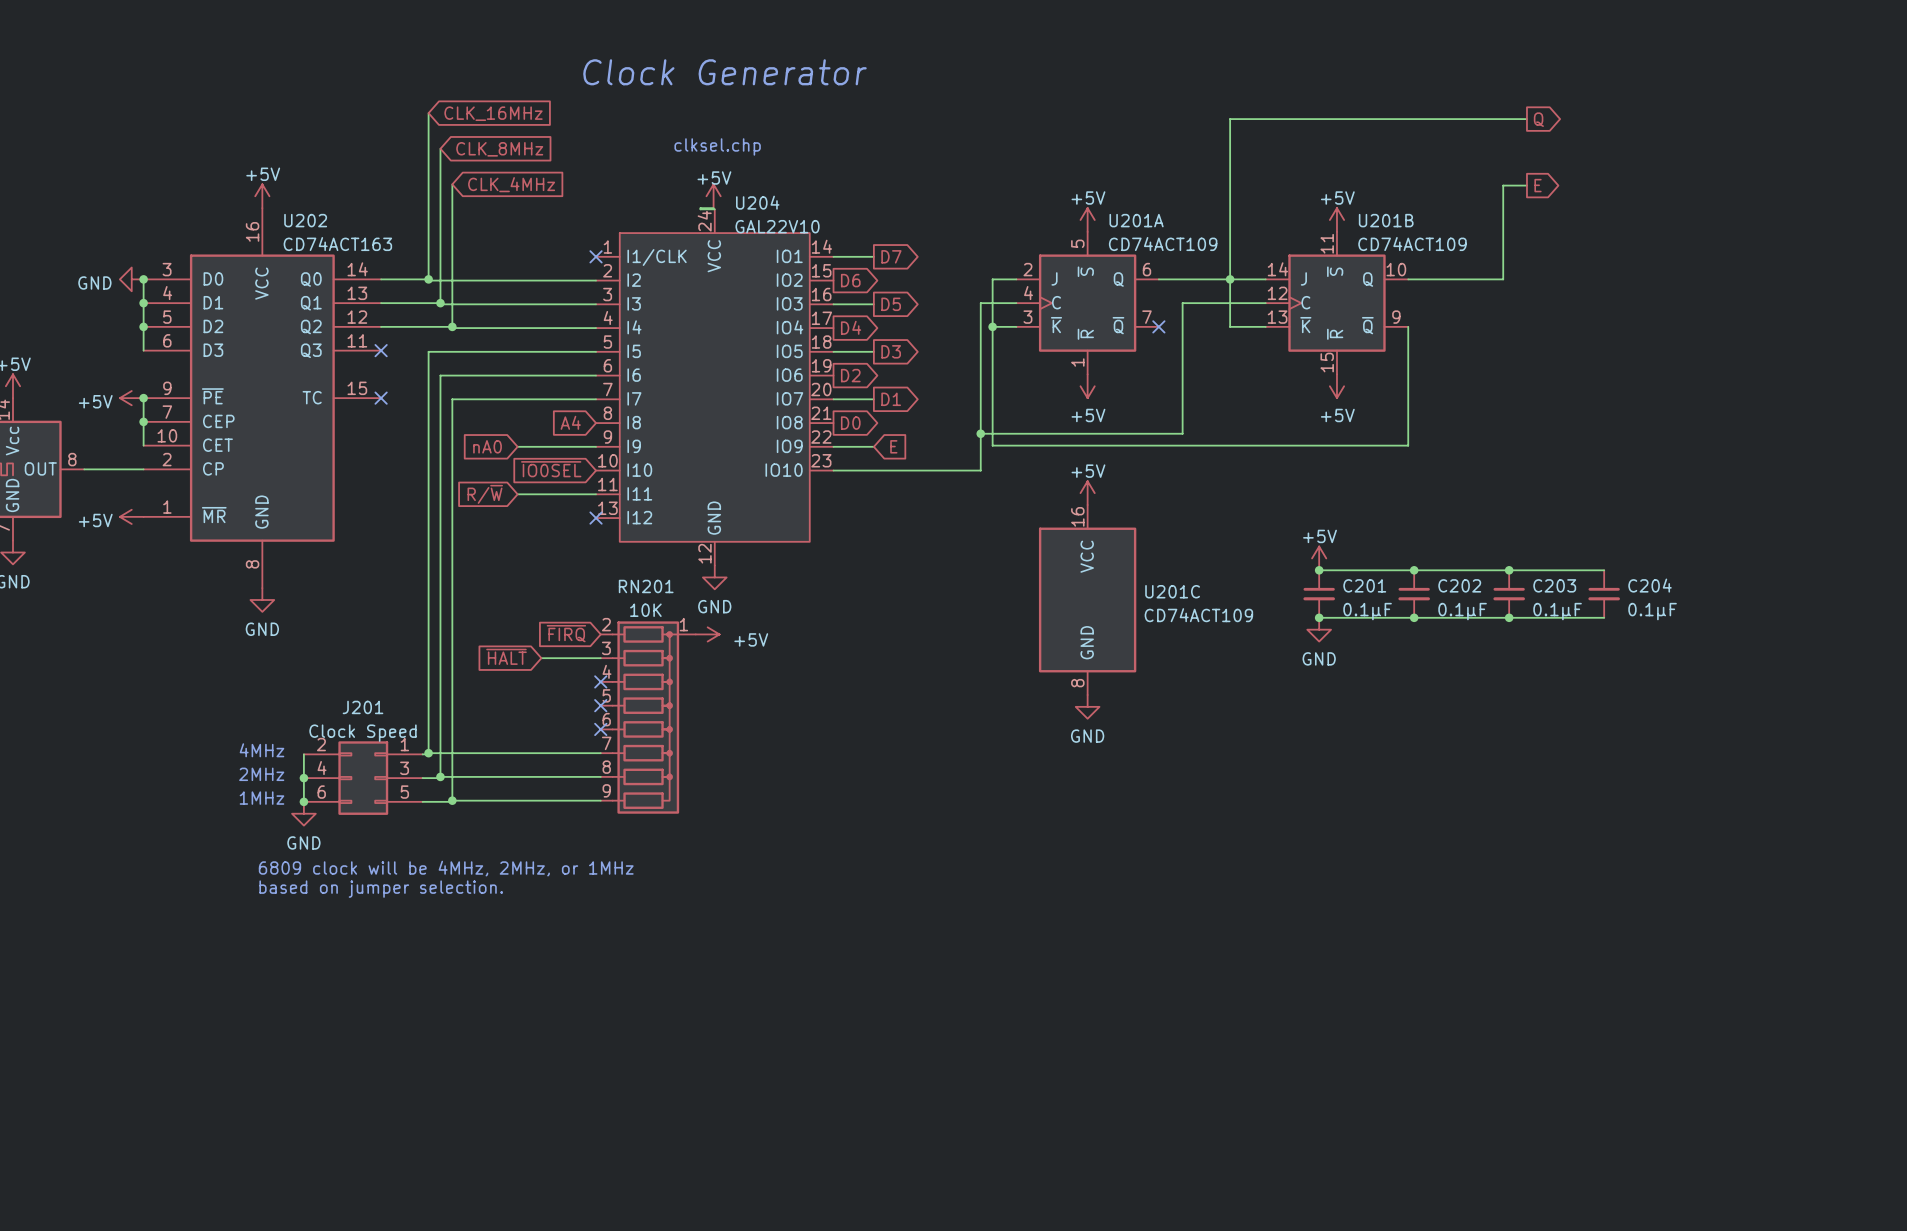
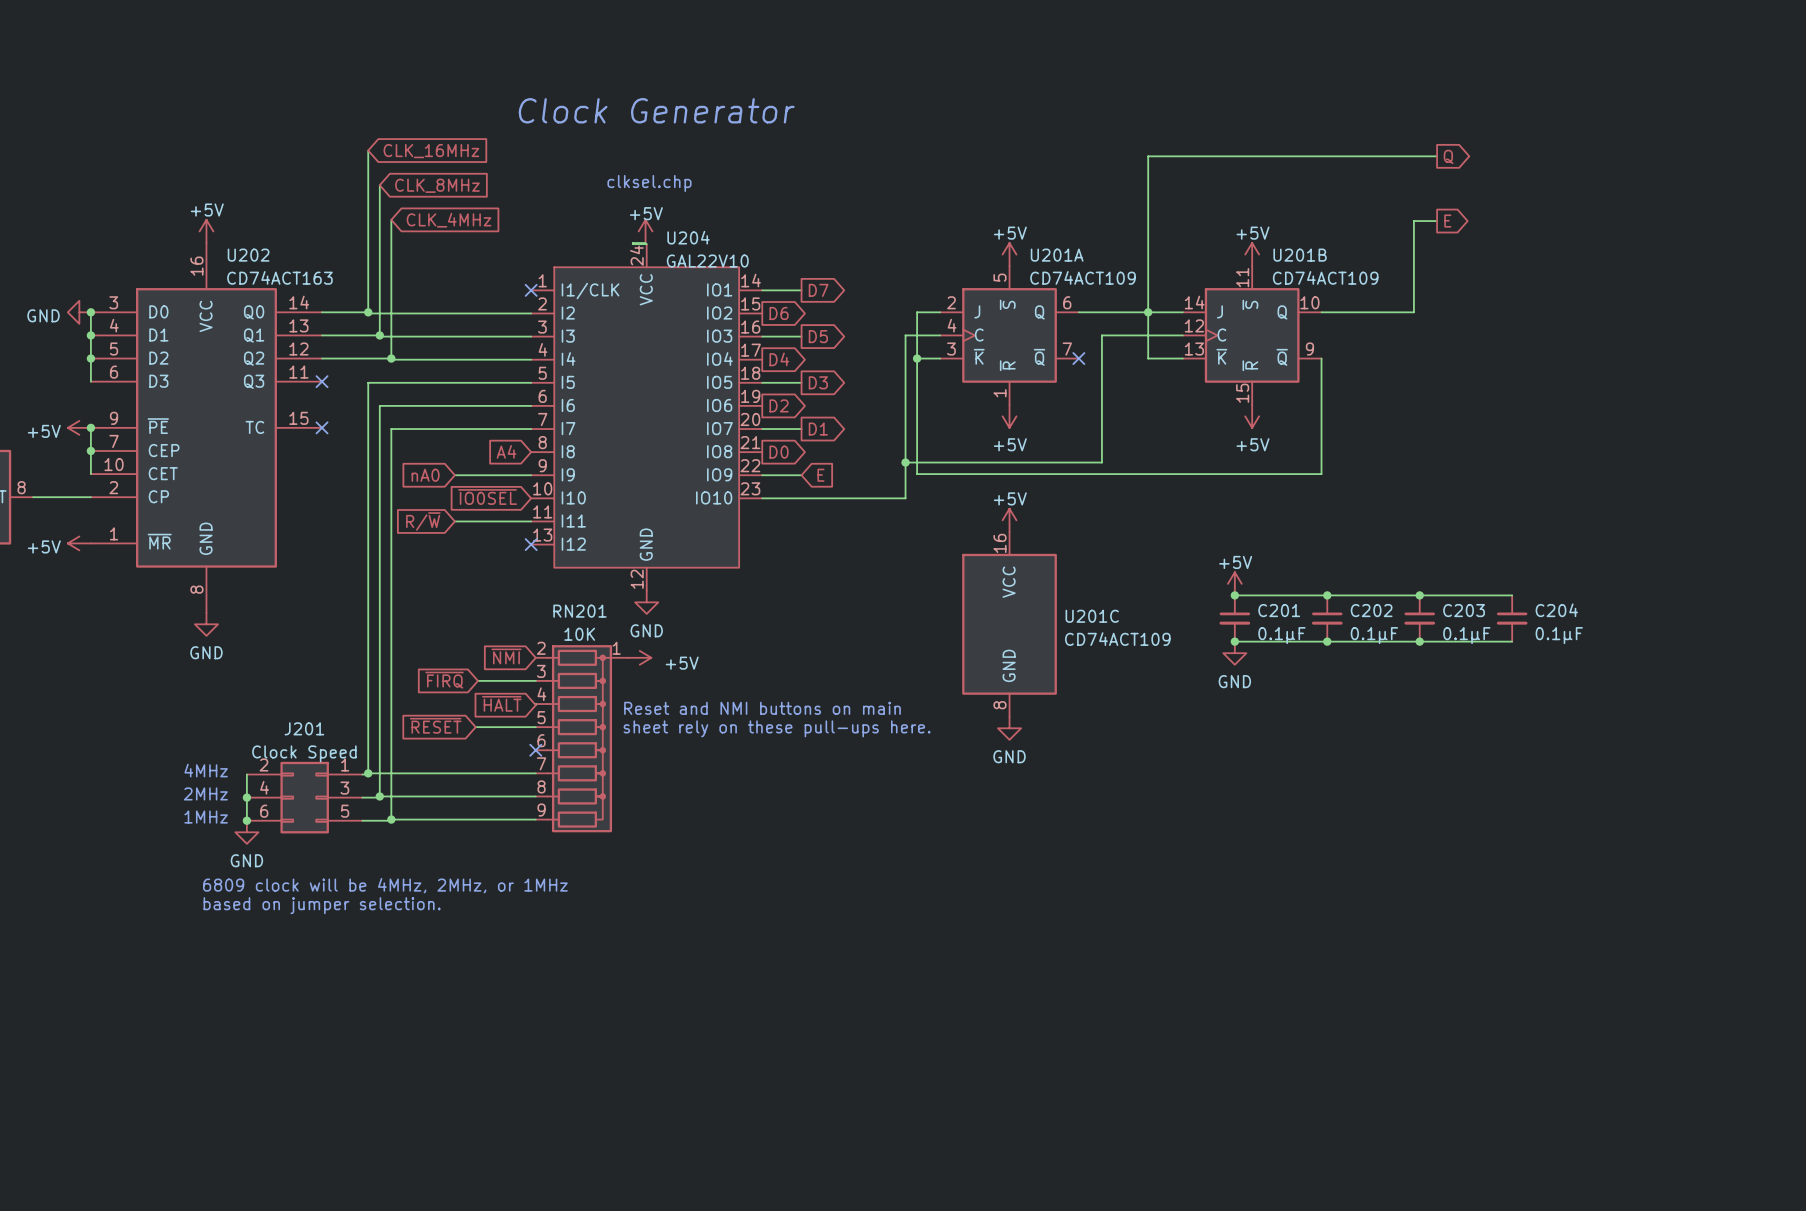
global label: ~{FIRQ} (566, 633) -> ~{NMI} (506, 656)
global label: ~{HALT} (506, 656) -> ~{FIRQ} (444, 680)
global label: none -> ~{HALT} (501, 703)
no-connect mark: (600, 681) -> none
text: none -> Reset and NMI buttons on main (762, 708)
global label: none -> ~{RESET} (435, 725)
wire: none -> (475, 727) (535, 727)
no-connect mark: (600, 705) -> none
text: none -> sheet rely on these pull-ups here. (777, 728)

